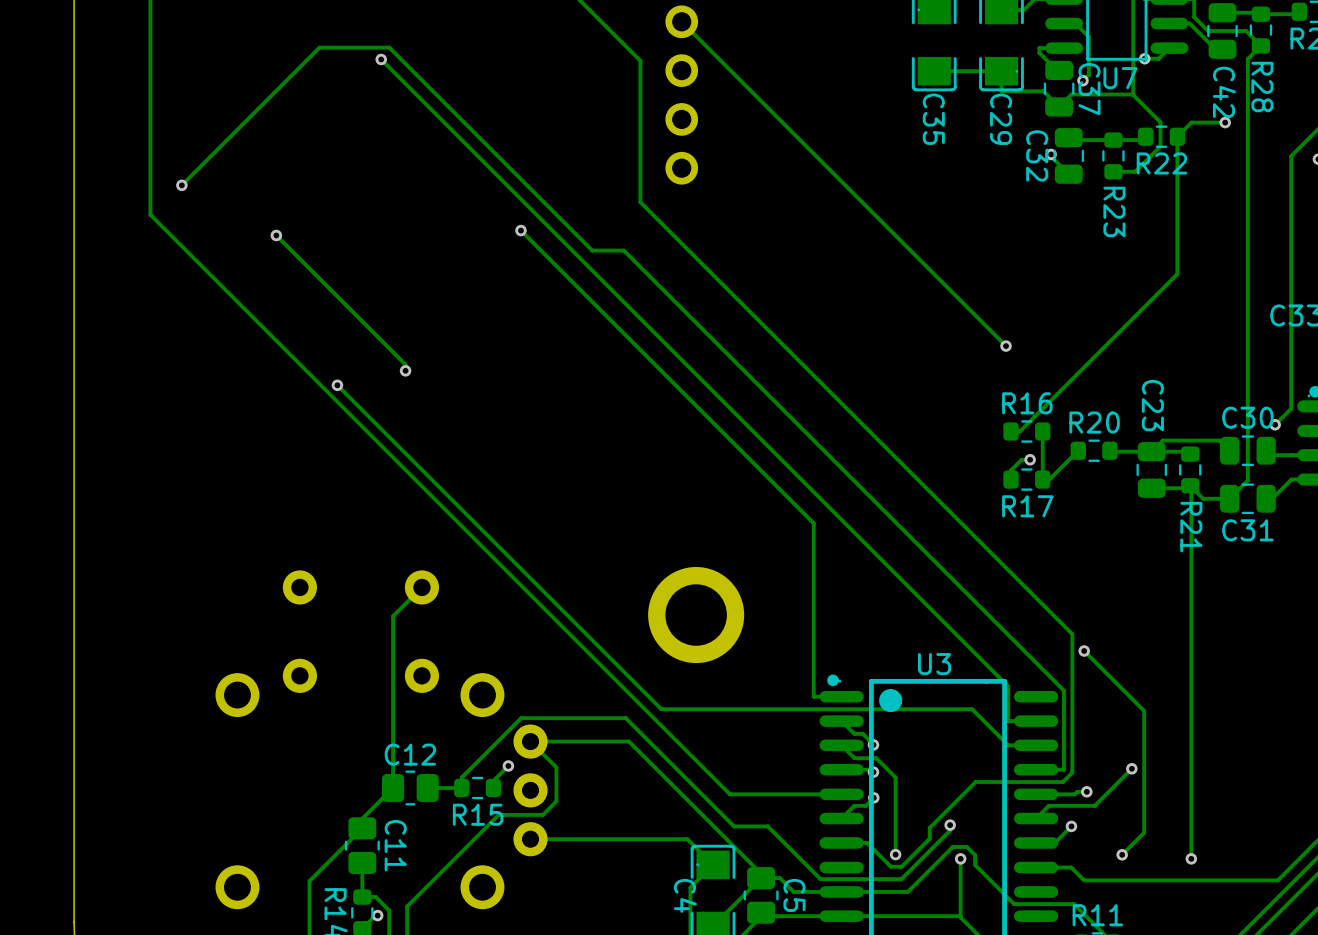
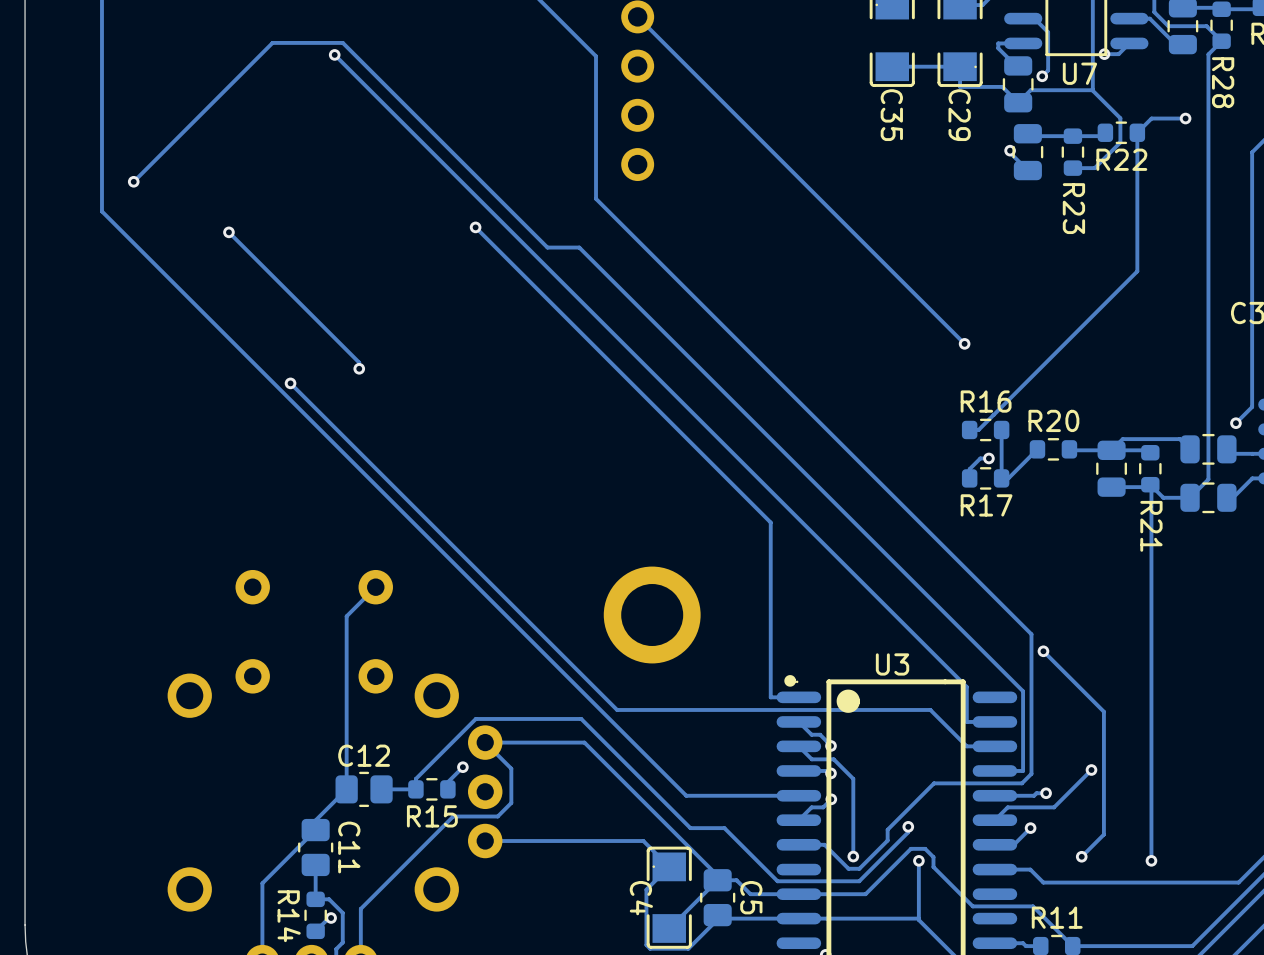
C37 name: C37 (1089, 89) -> none
C42 name: C42 (1224, 92) -> none
C32 name: C32 (1037, 155) -> none
C23 name: C23 (1152, 405) -> none
C30 name: C30 (1247, 417) -> none
C31 name: C31 (1247, 530) -> none

